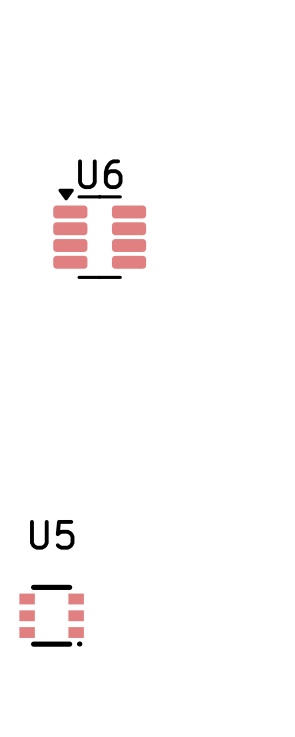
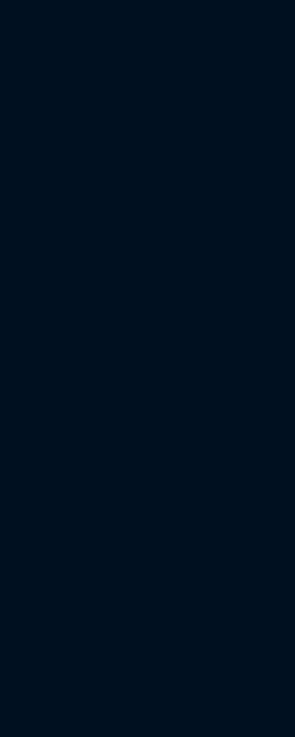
U6: (99, 233) -> none
U5: (51, 615) -> none

